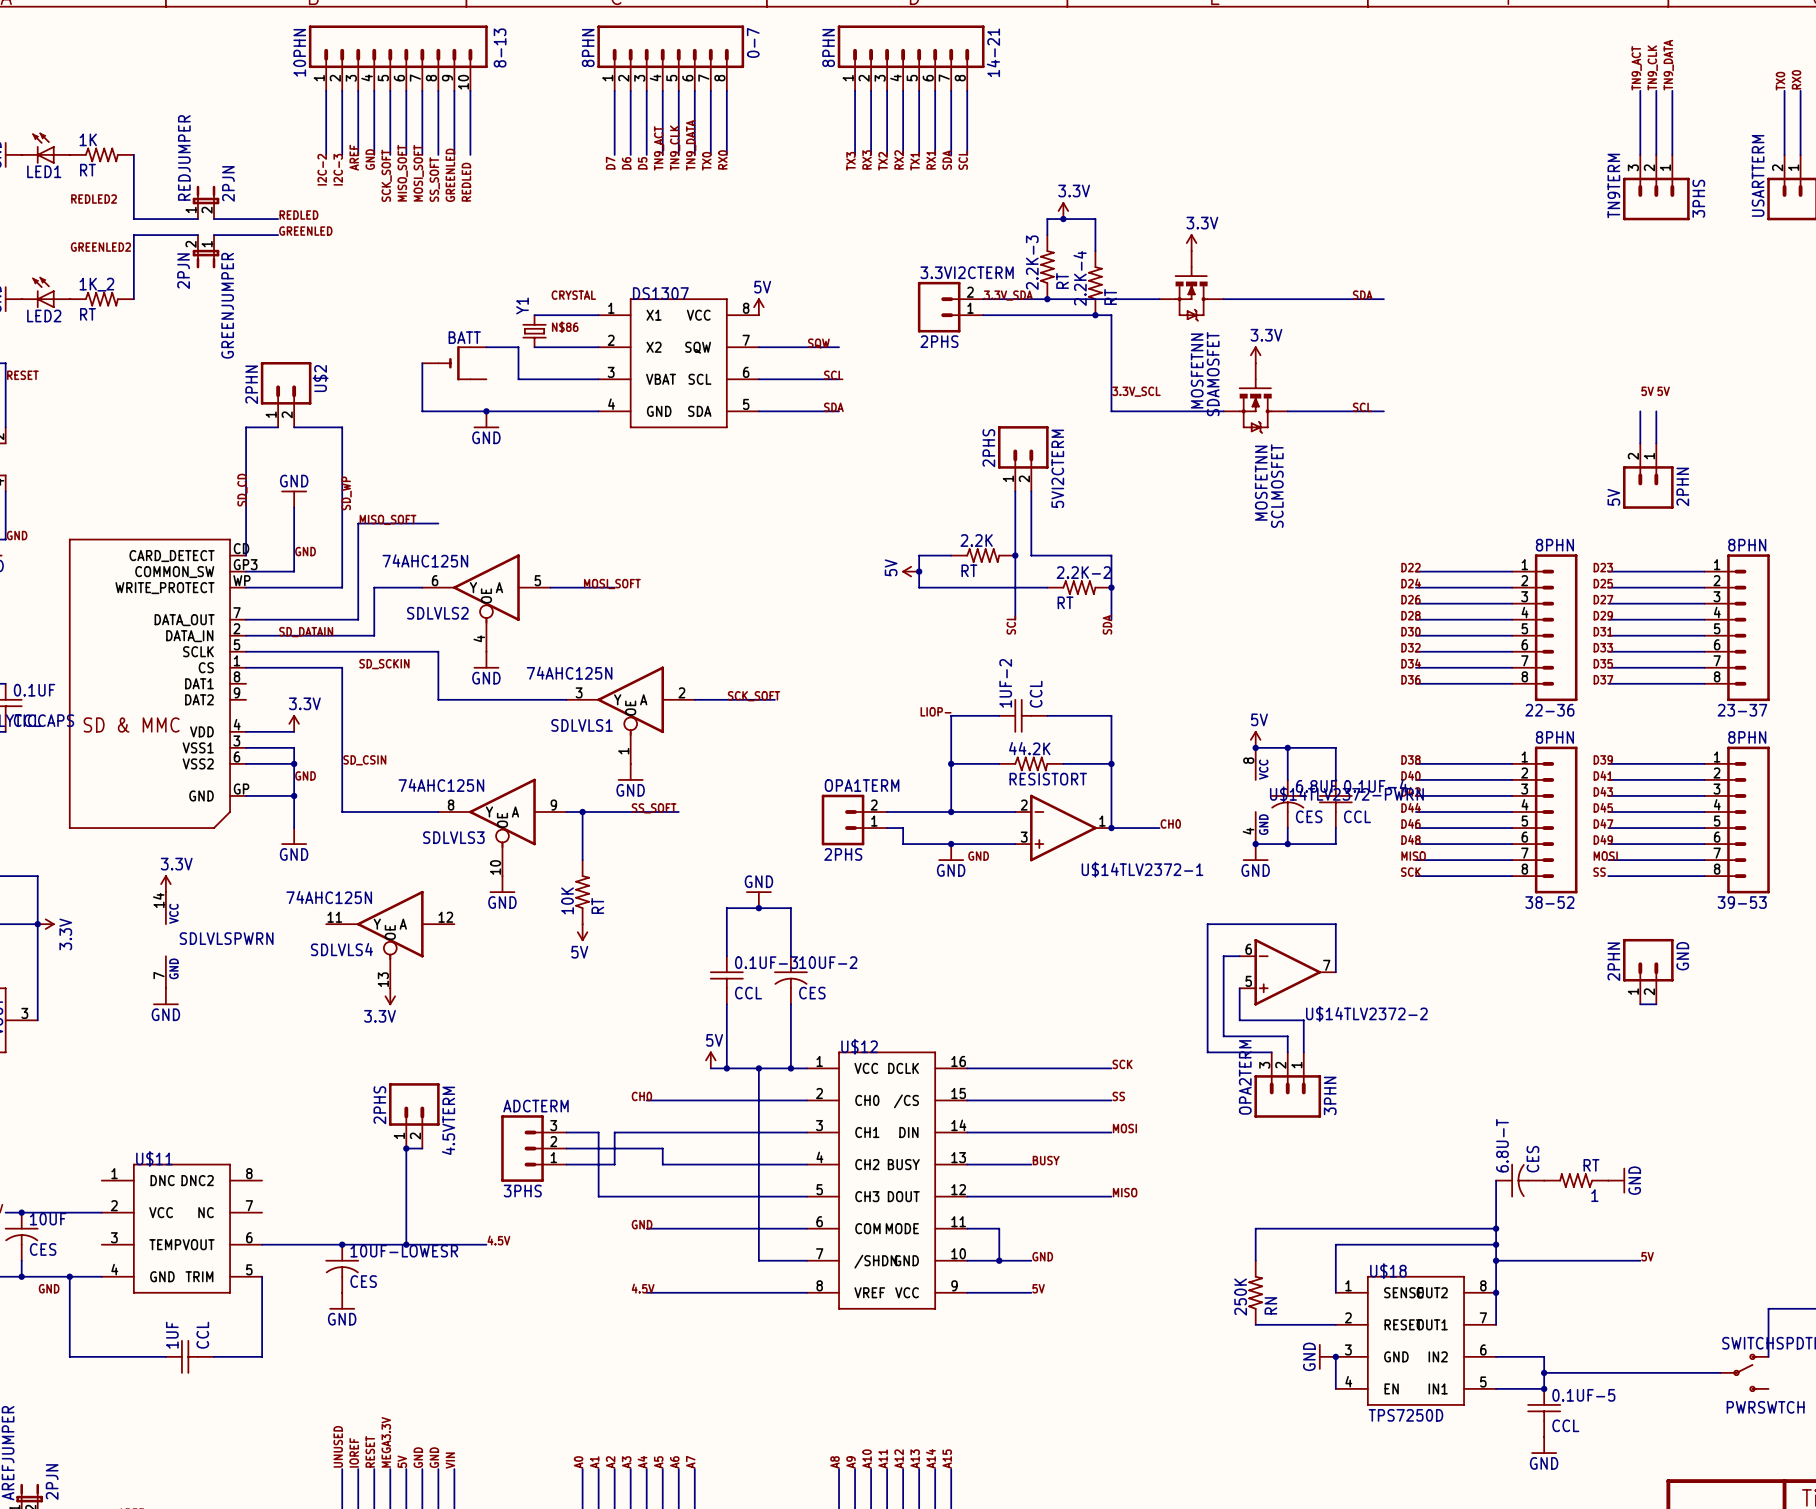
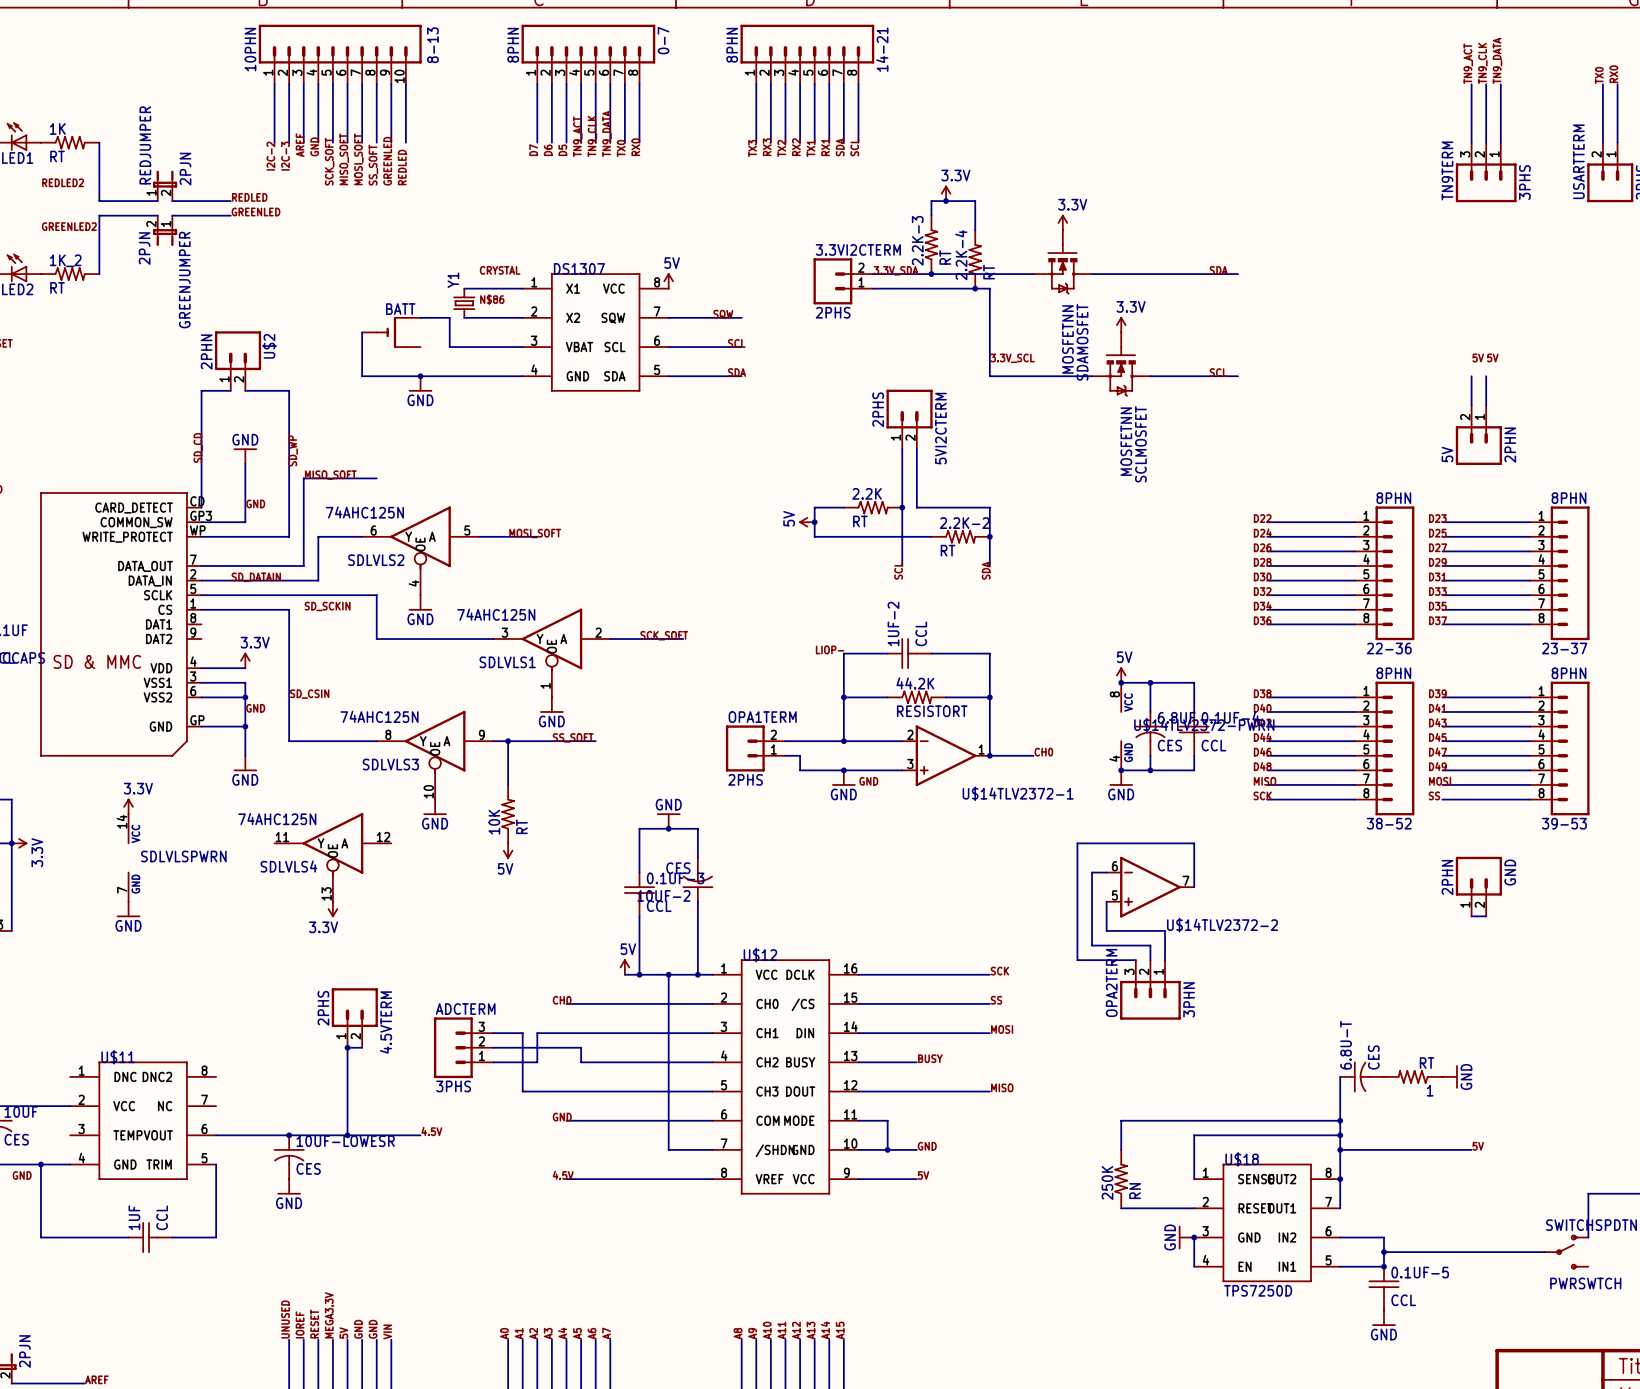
10UF-2 rotation: 0° (790, 980) -> 180° (697, 880)

